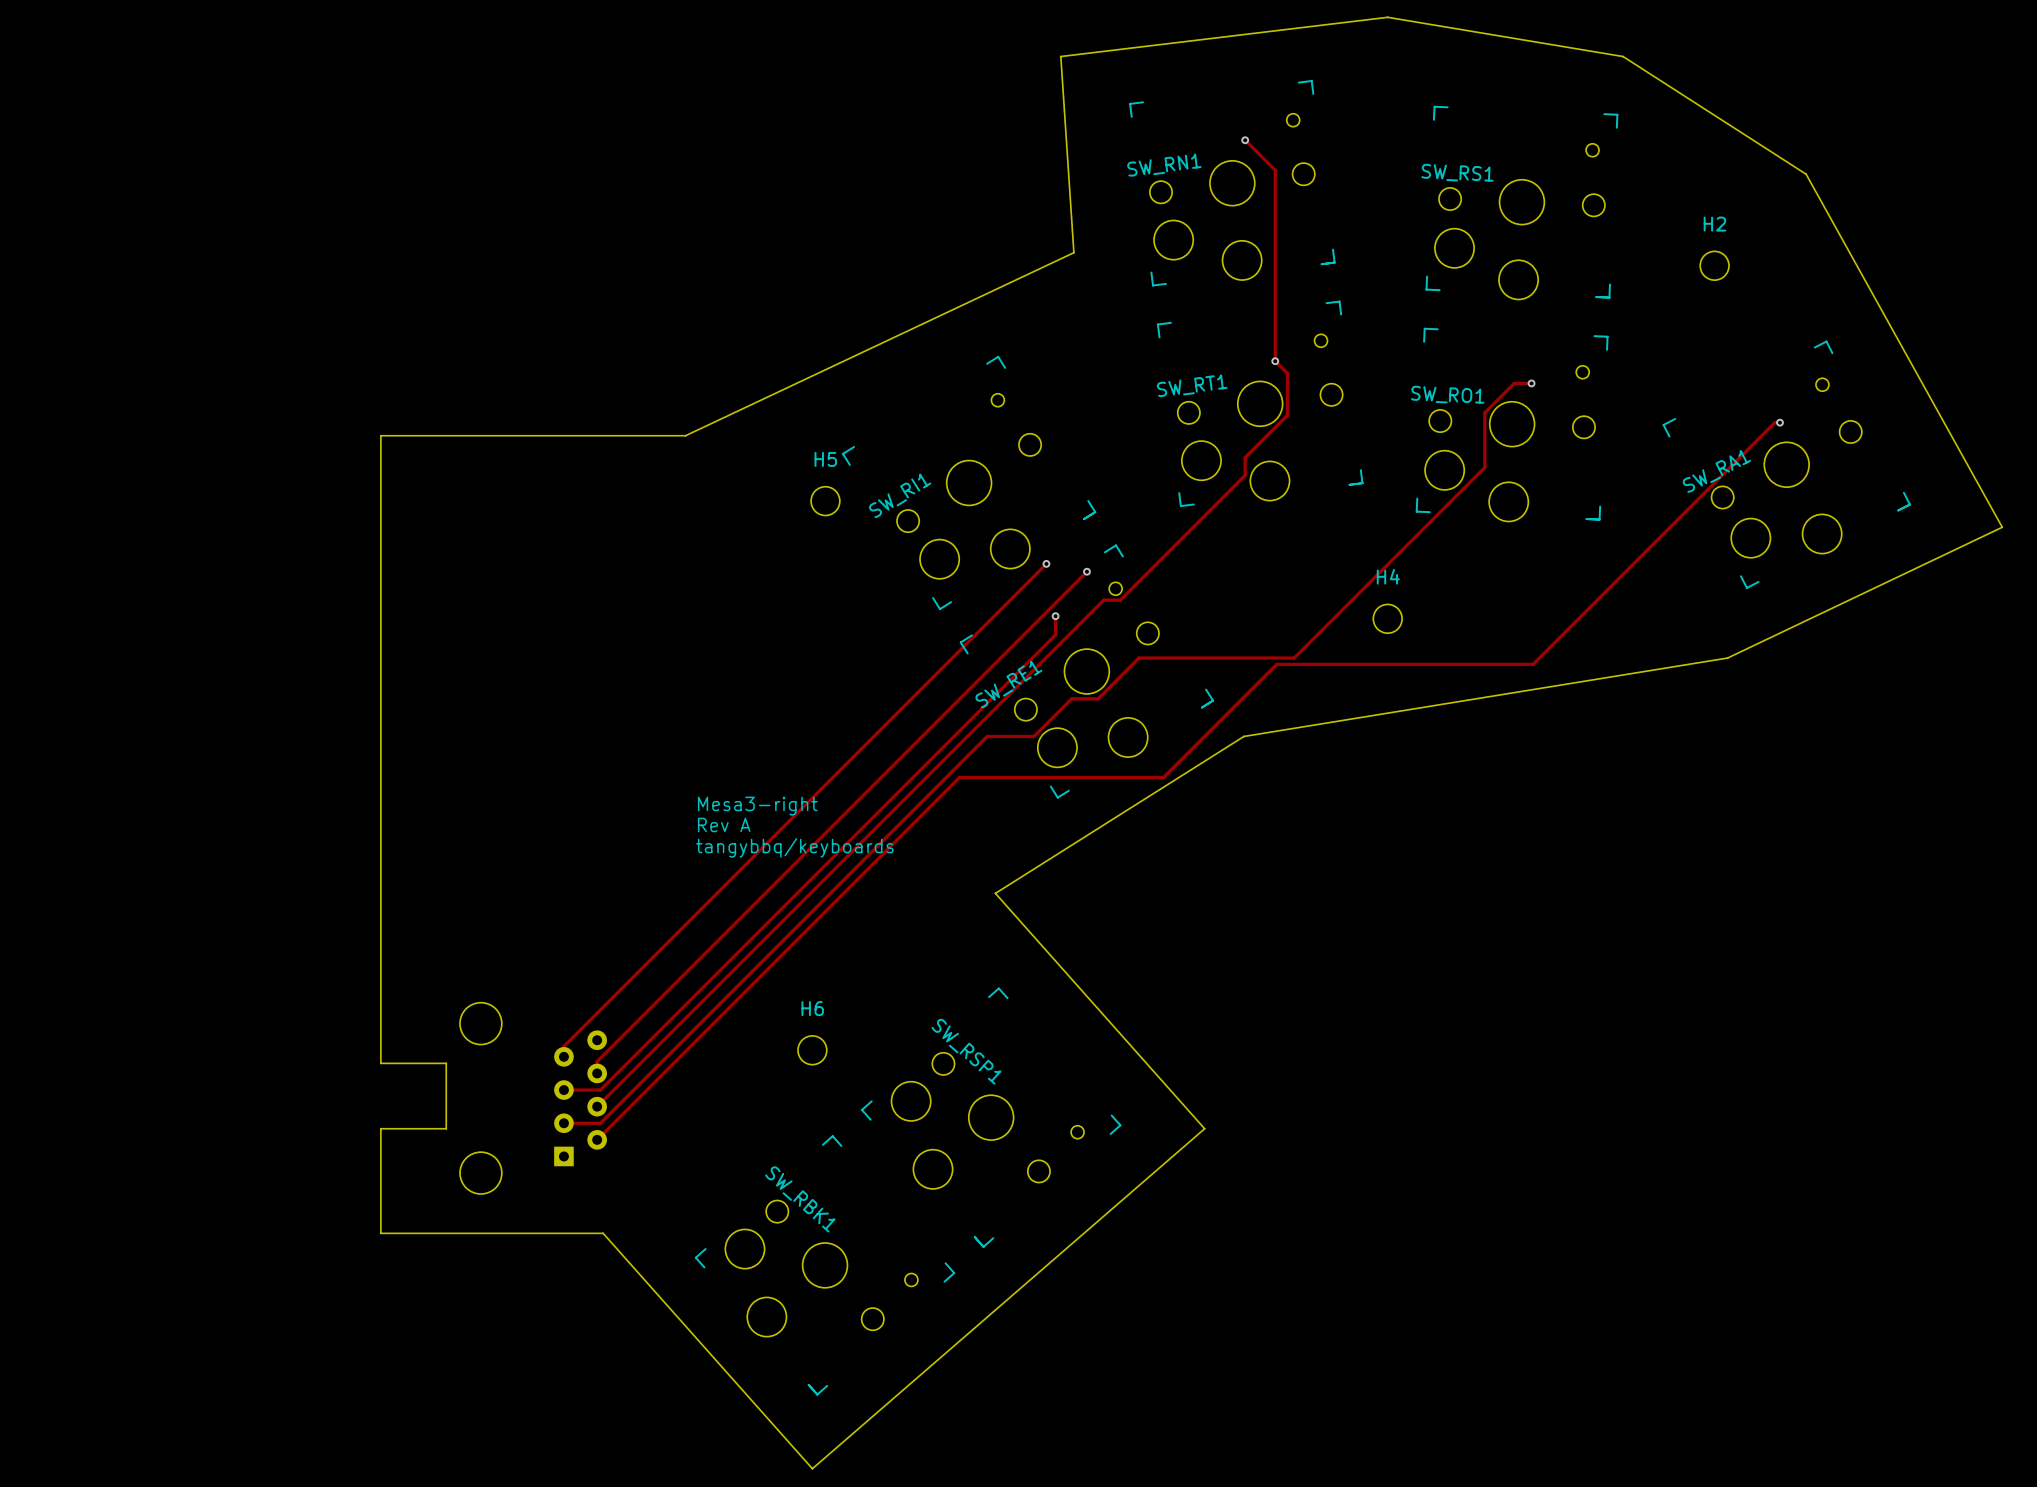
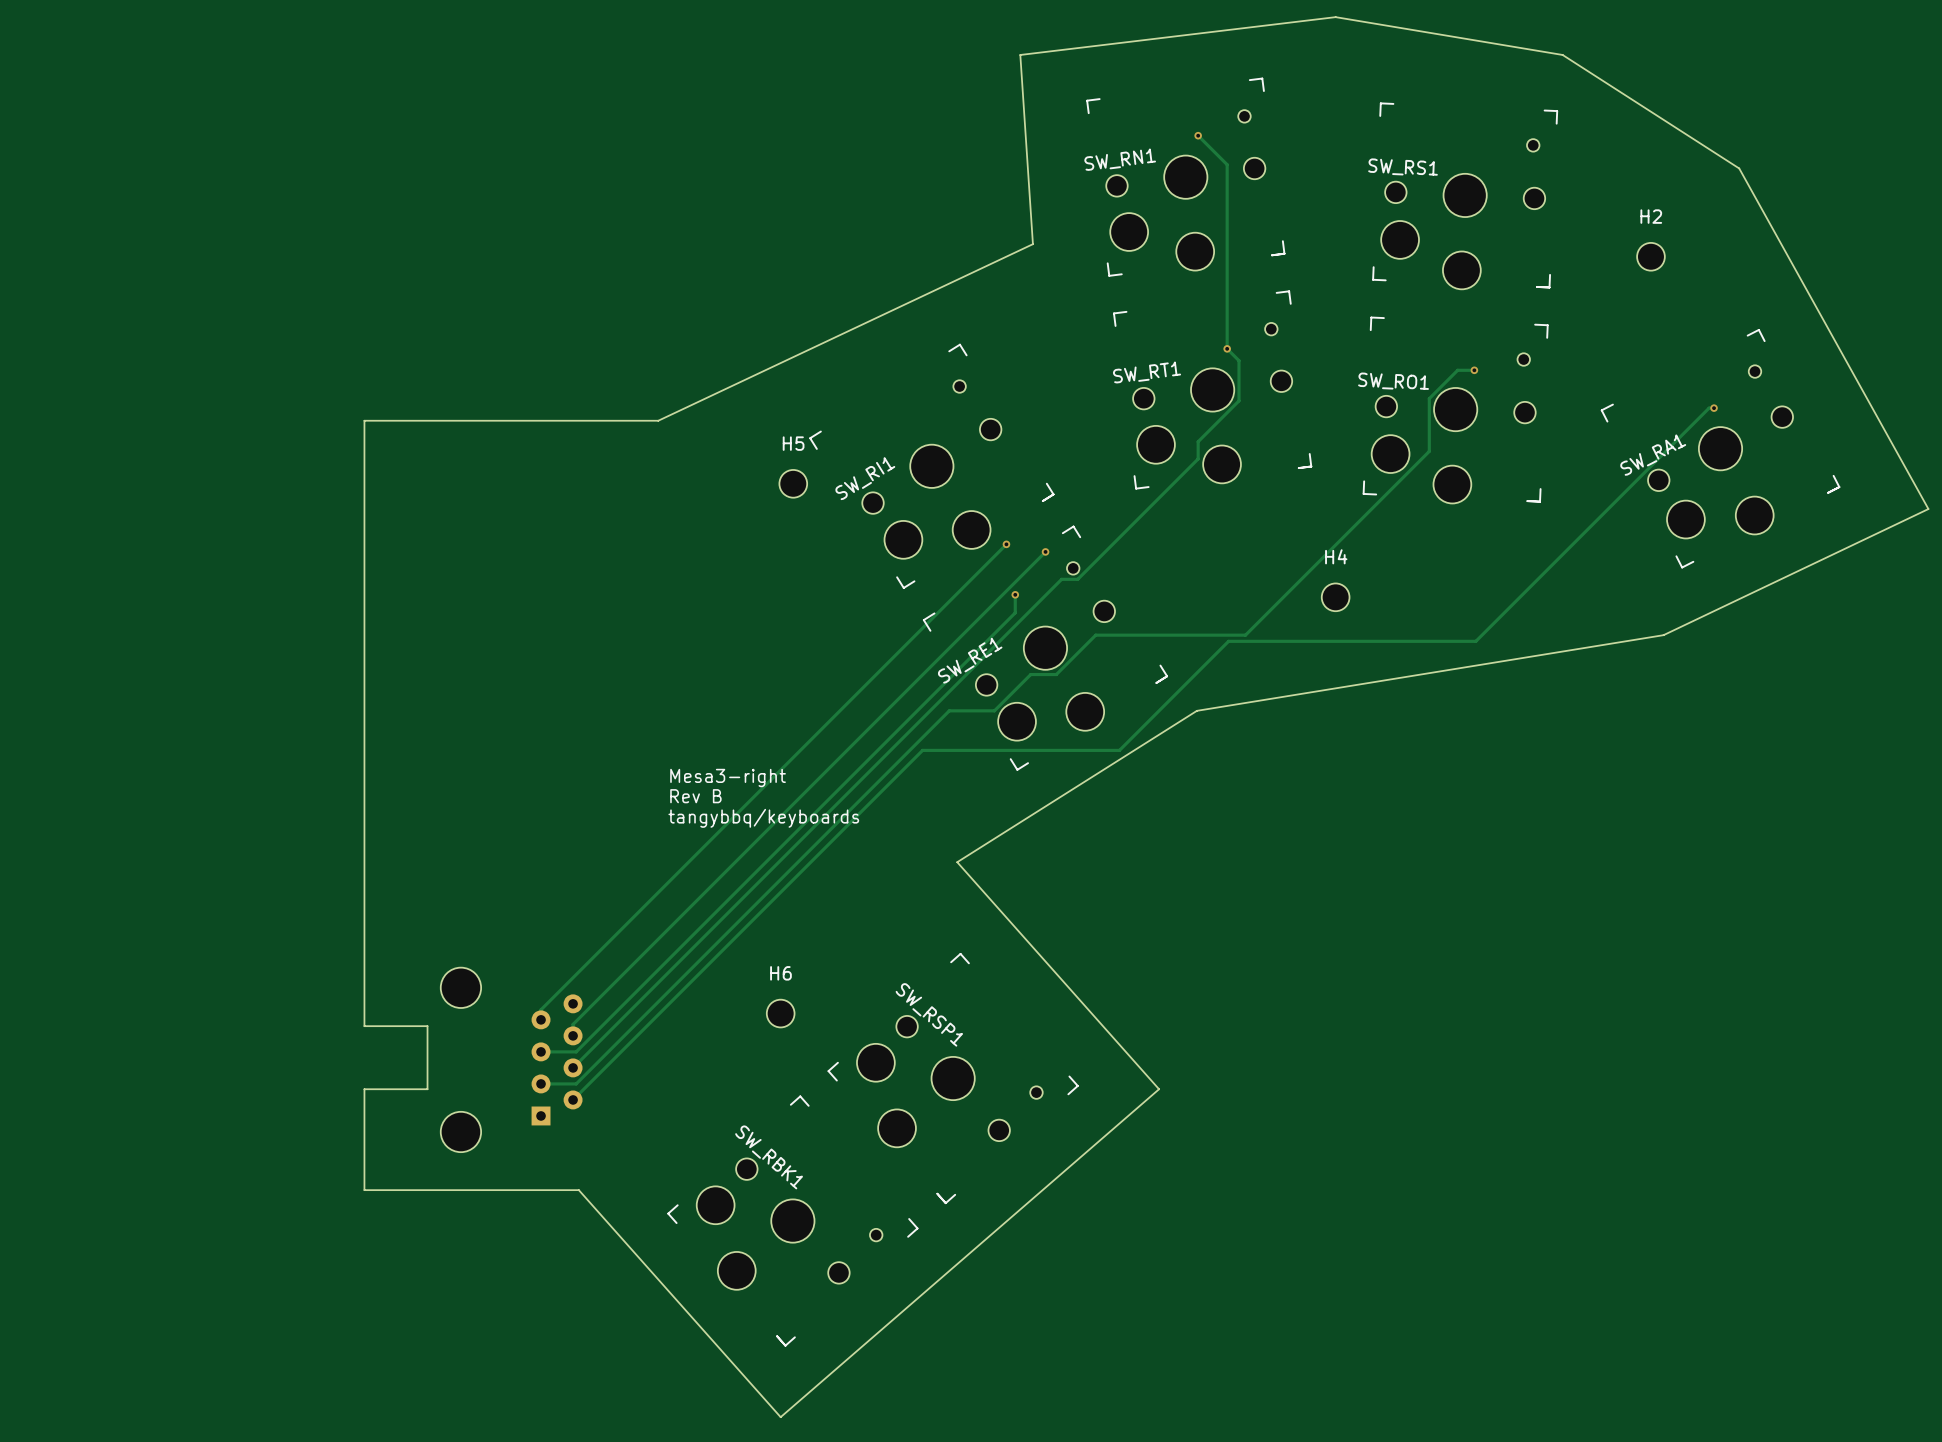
text: Rev A (724, 824) -> Rev B (695, 796)

